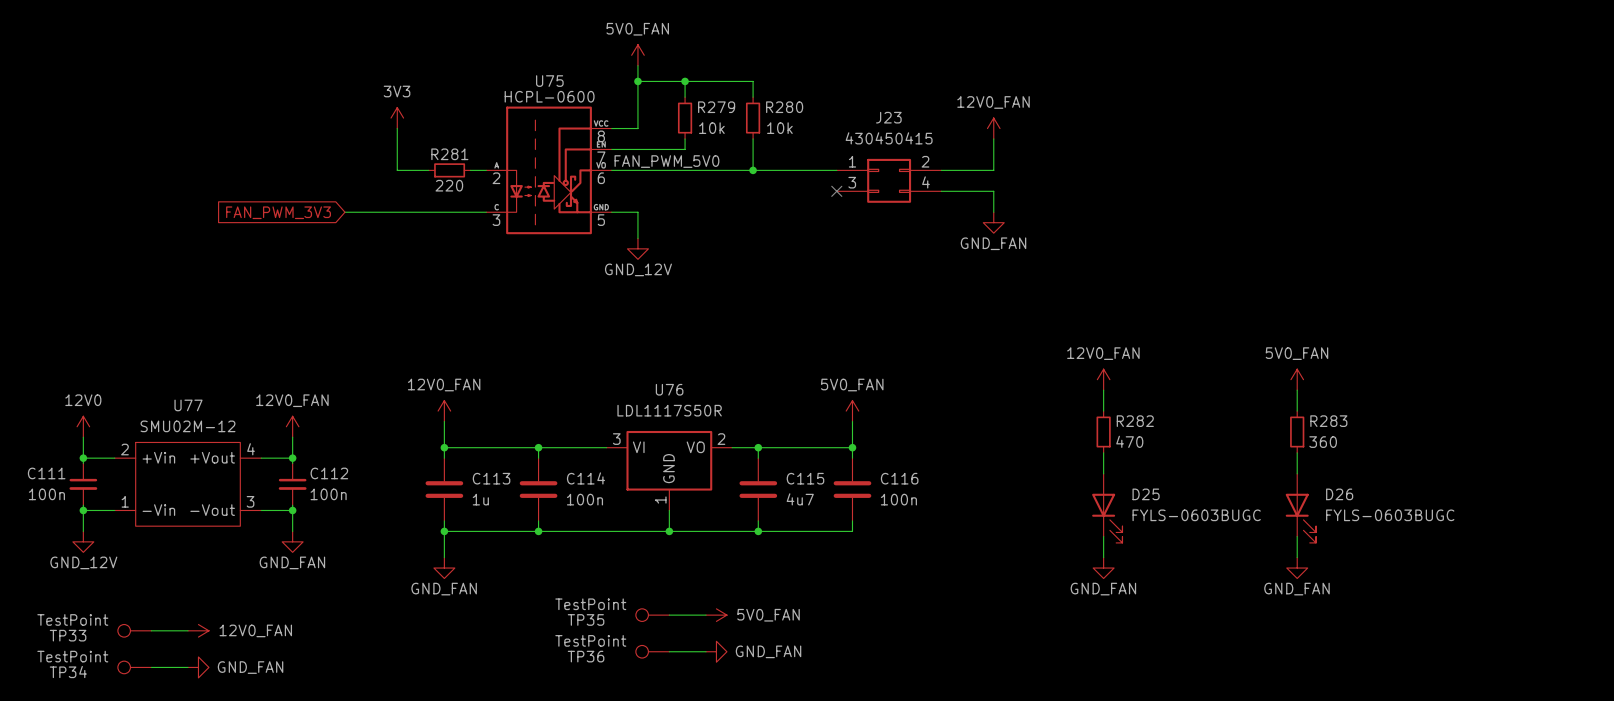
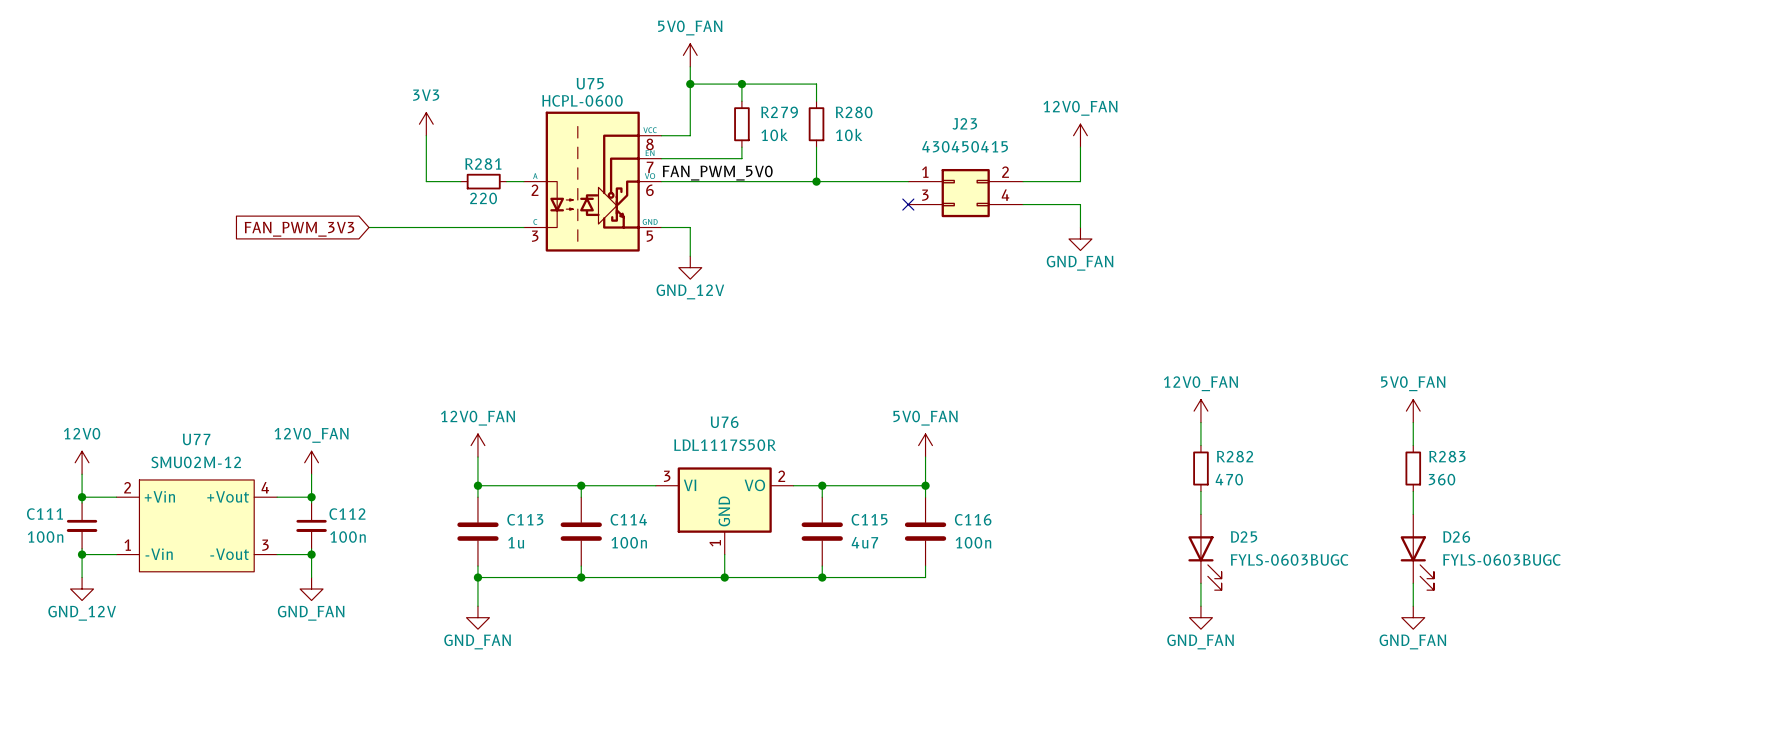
TP35: TestPoint (652, 615) -> none
wire: (669, 615) (705, 615) -> none
power symbol: 5V0_FAN (716, 615) -> none
TP33: TestPoint (134, 630) -> none
wire: (151, 630) (188, 630) -> none
power symbol: 12V0_FAN (198, 630) -> none
TP36: TestPoint (652, 651) -> none
wire: (669, 651) (705, 651) -> none
power symbol: GND_FAN (716, 651) -> none
TP34: TestPoint (134, 667) -> none
wire: (151, 667) (188, 667) -> none
power symbol: GND_FAN (198, 667) -> none

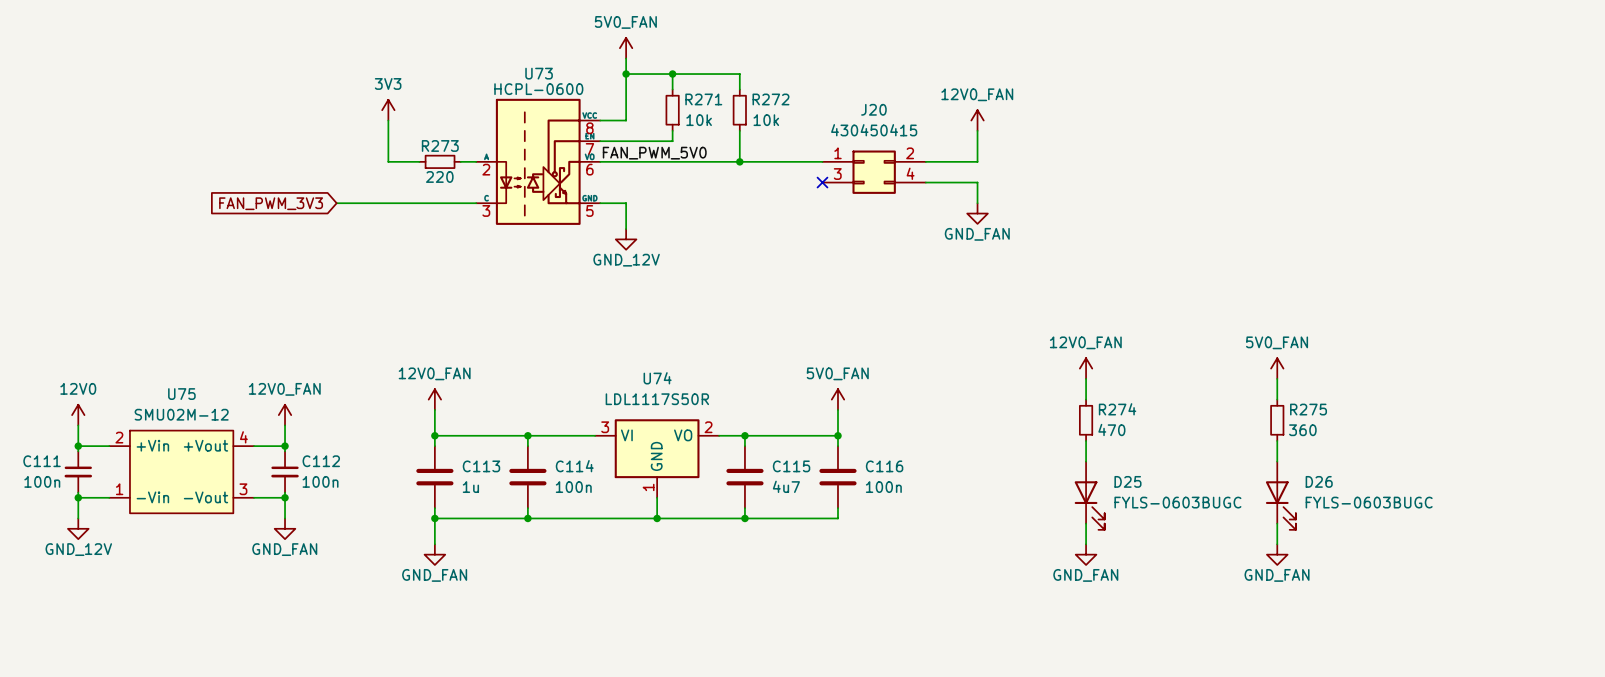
U75 name: U75 (590, 83) -> U73 (539, 73)
R279 name: R279 (779, 112) -> R271 (703, 99)
R280 name: R280 (854, 112) -> R272 (770, 99)
J23 name: J23 (964, 123) -> J20 (873, 109)
R281 name: R281 (483, 164) -> R273 (440, 145)
U76 name: U76 (724, 422) -> U74 (657, 378)
U77 name: U77 (196, 439) -> U75 (181, 394)
R282 name: R282 (1235, 456) -> R274 (1117, 409)
R283 name: R283 (1447, 456) -> R275 (1308, 409)

